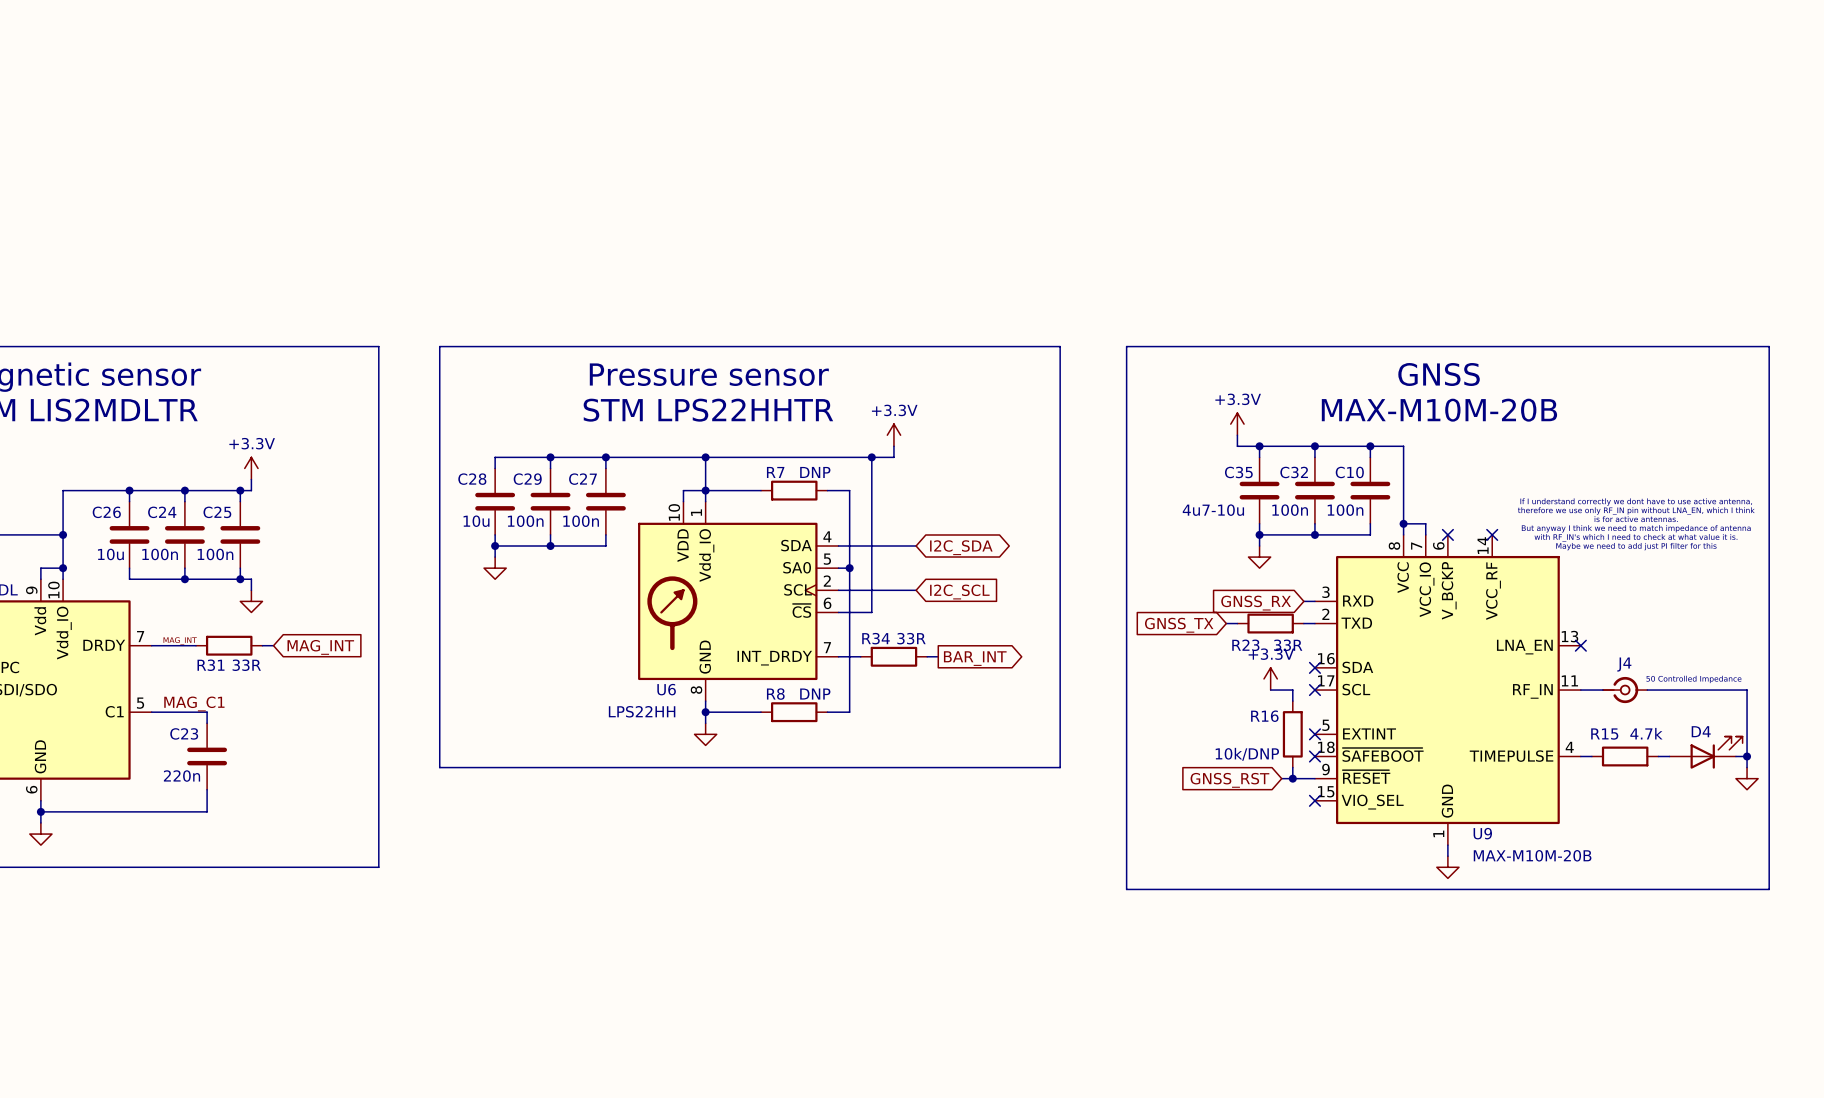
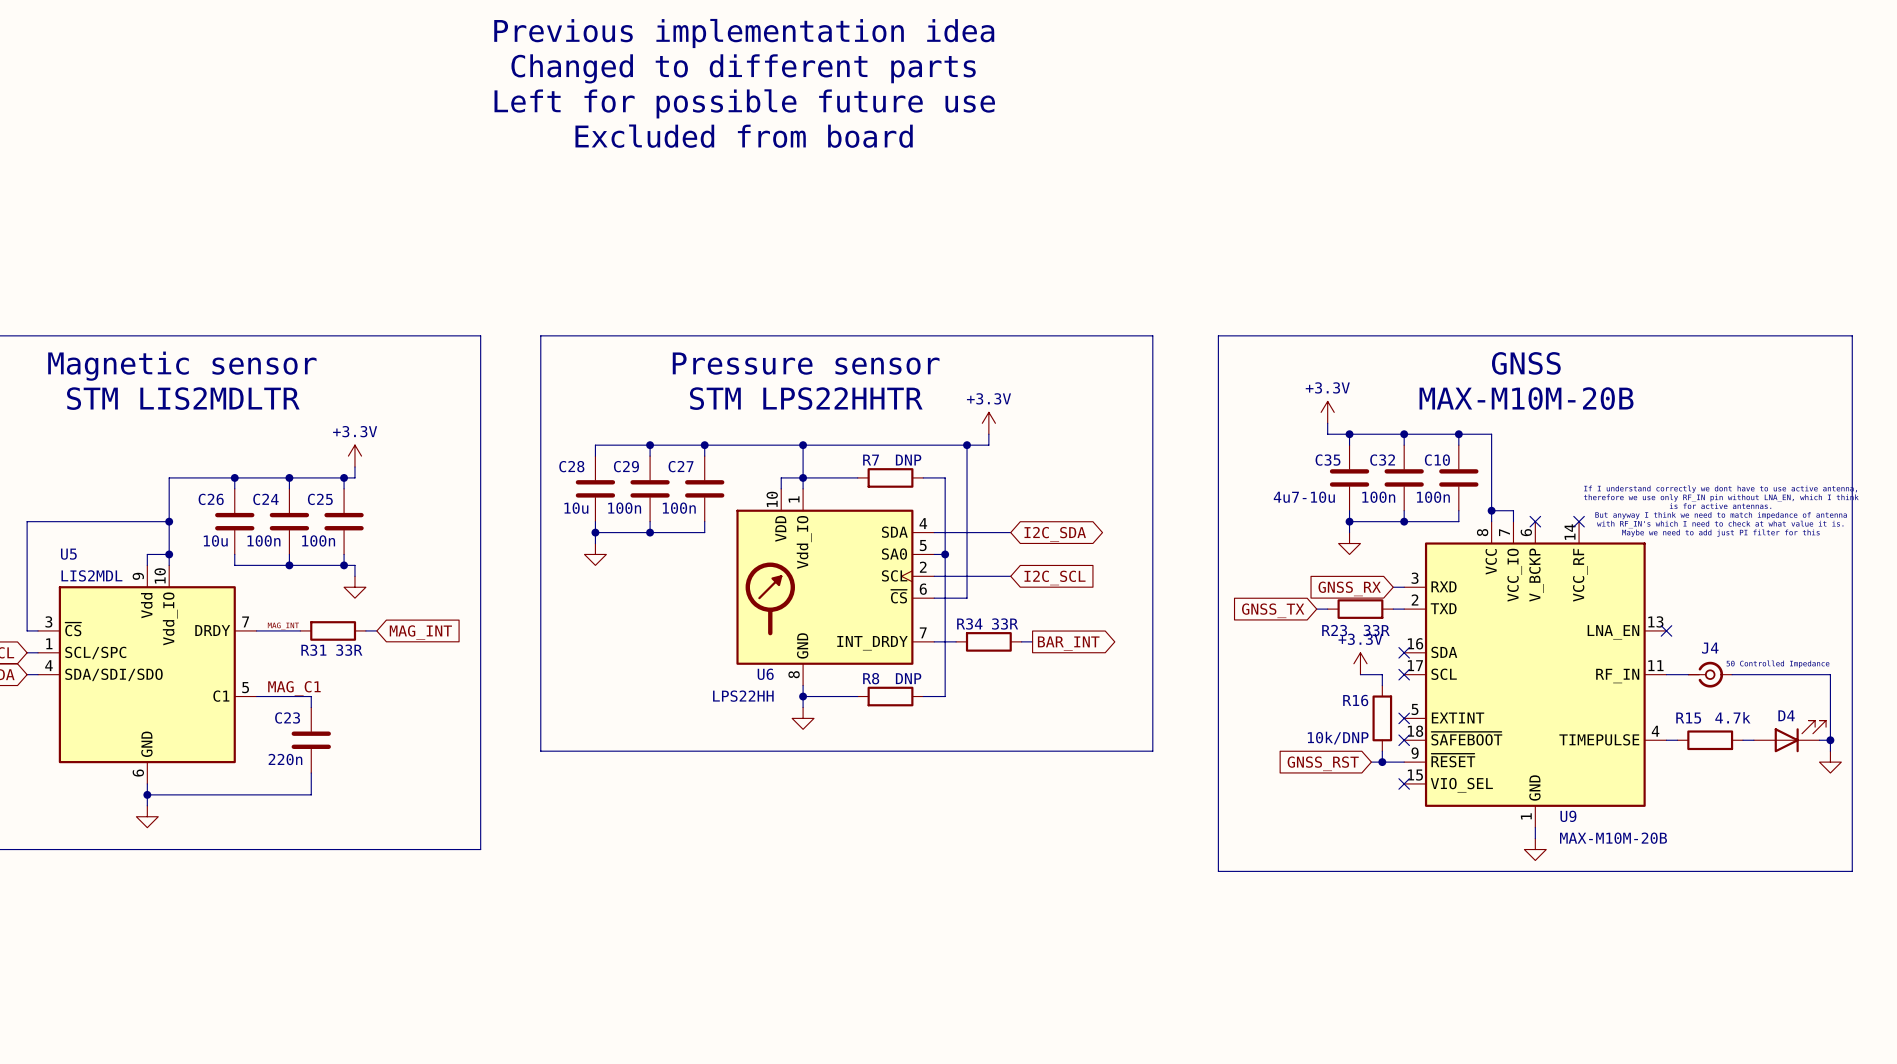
text: none -> Previous implementation idea (744, 33)
text: none -> Changed to different parts (743, 68)
text: none -> Left for possible future use (744, 103)
text: none -> Excluded from board (744, 136)

